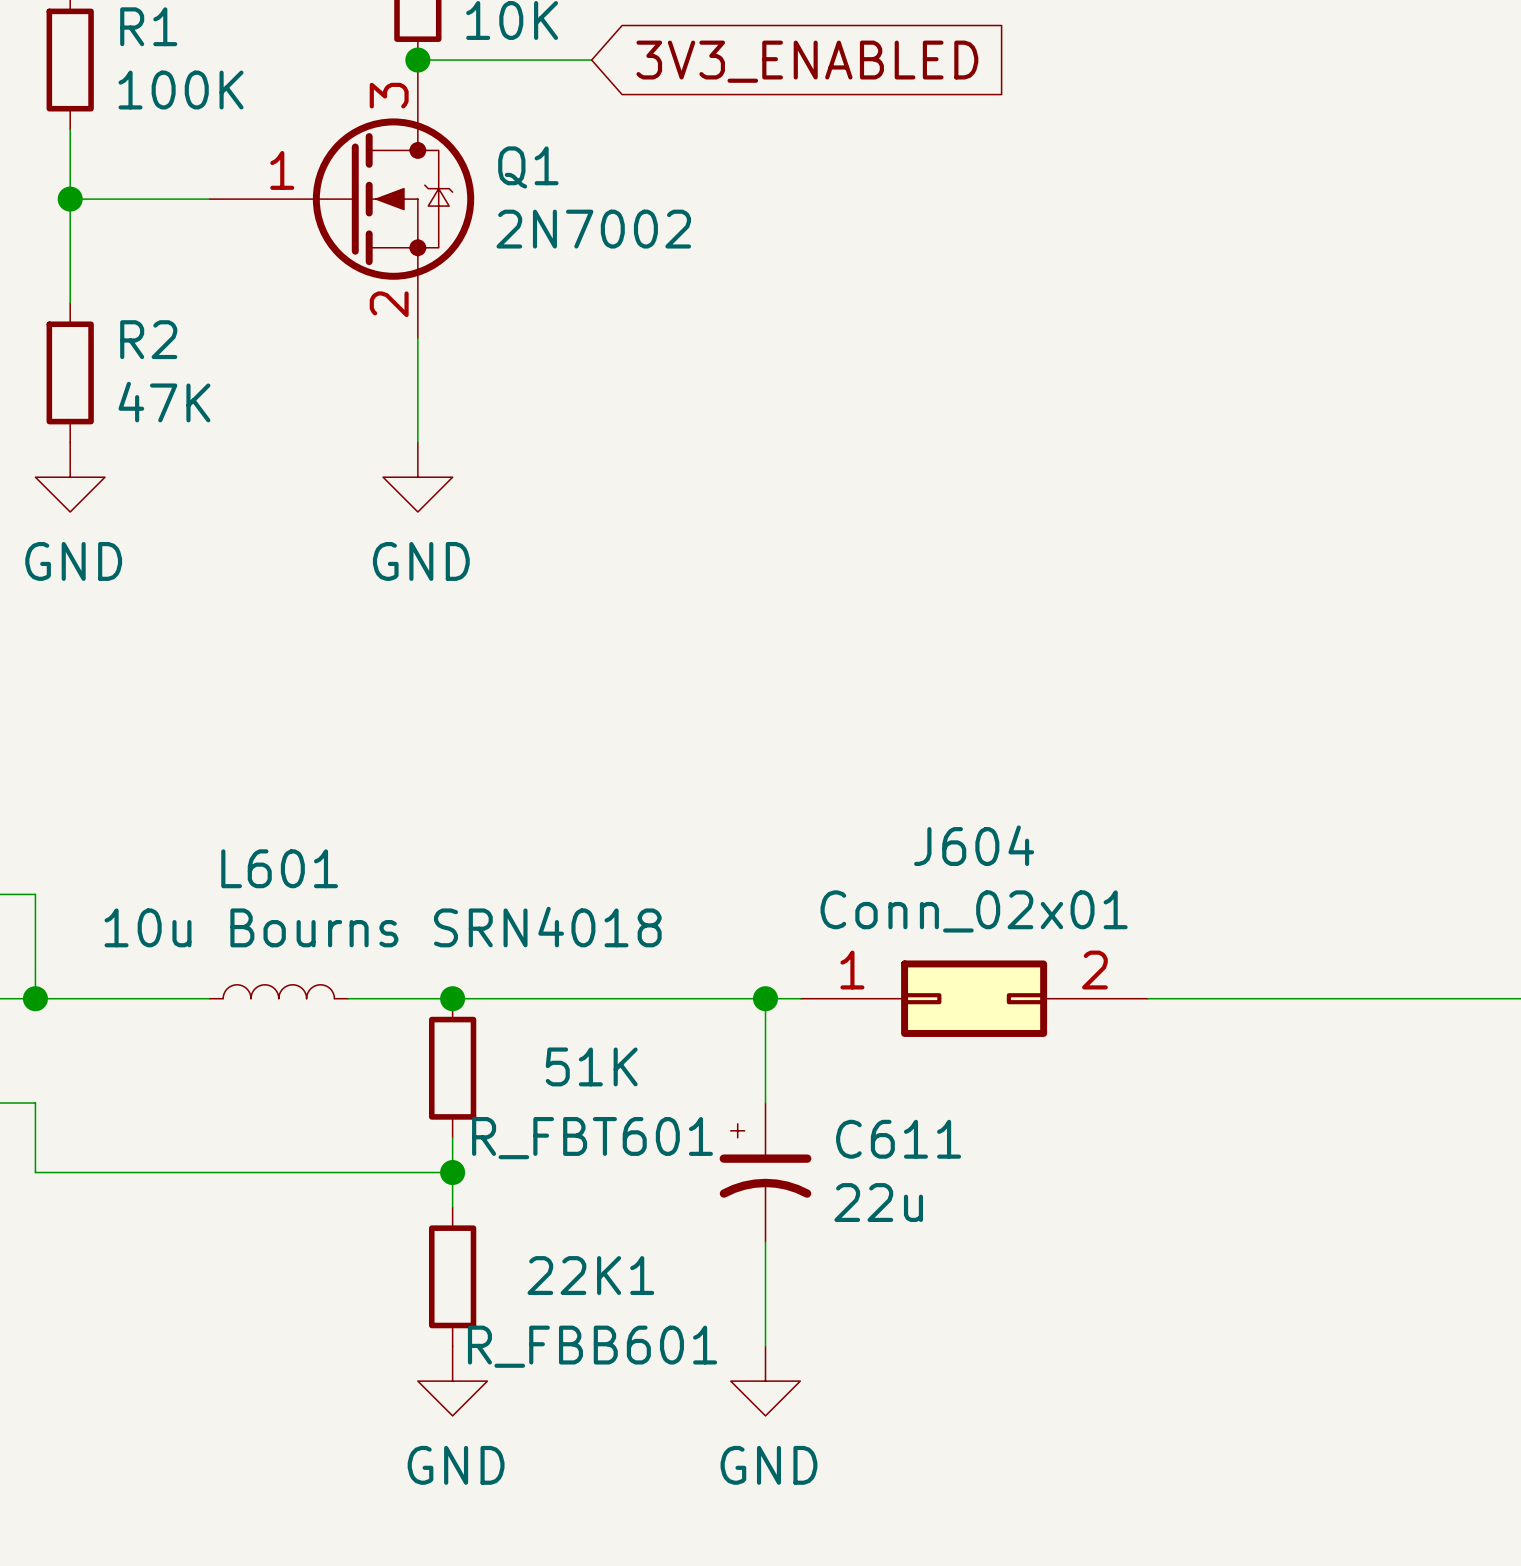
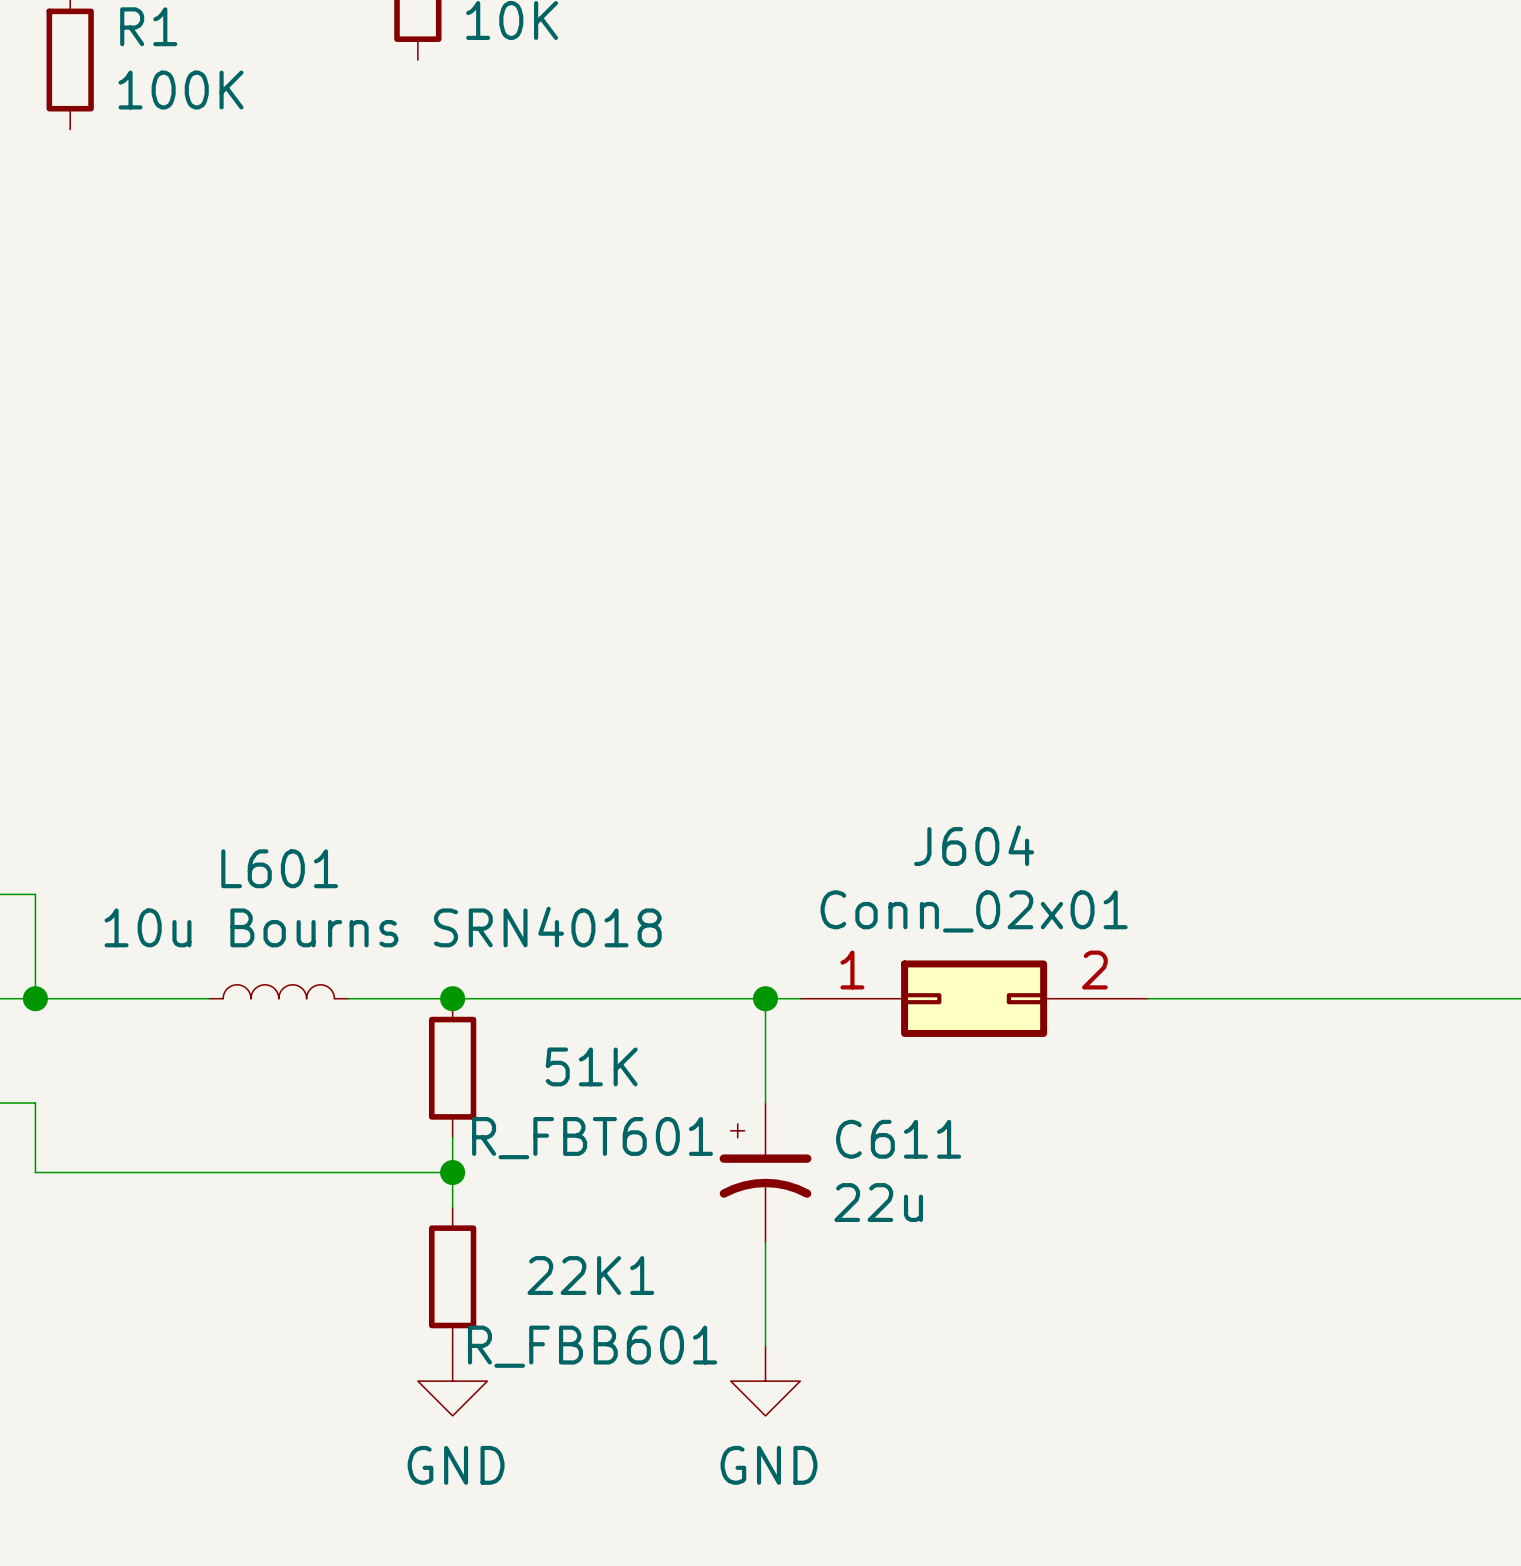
wire: (417, 60) (591, 60) -> none
junction: (417, 60) -> none
global label: 3V3_ENABLED (807, 61) -> none
wire: (70, 129) (70, 303) -> none
wire: (70, 199) (209, 199) -> none
junction: (70, 199) -> none
Q1: 2N7002 (341, 199) -> none
wire: (417, 338) (417, 442) -> none
R2: 47K (70, 372) -> none
power symbol: GND (70, 477) -> none
power symbol: GND (417, 477) -> none

